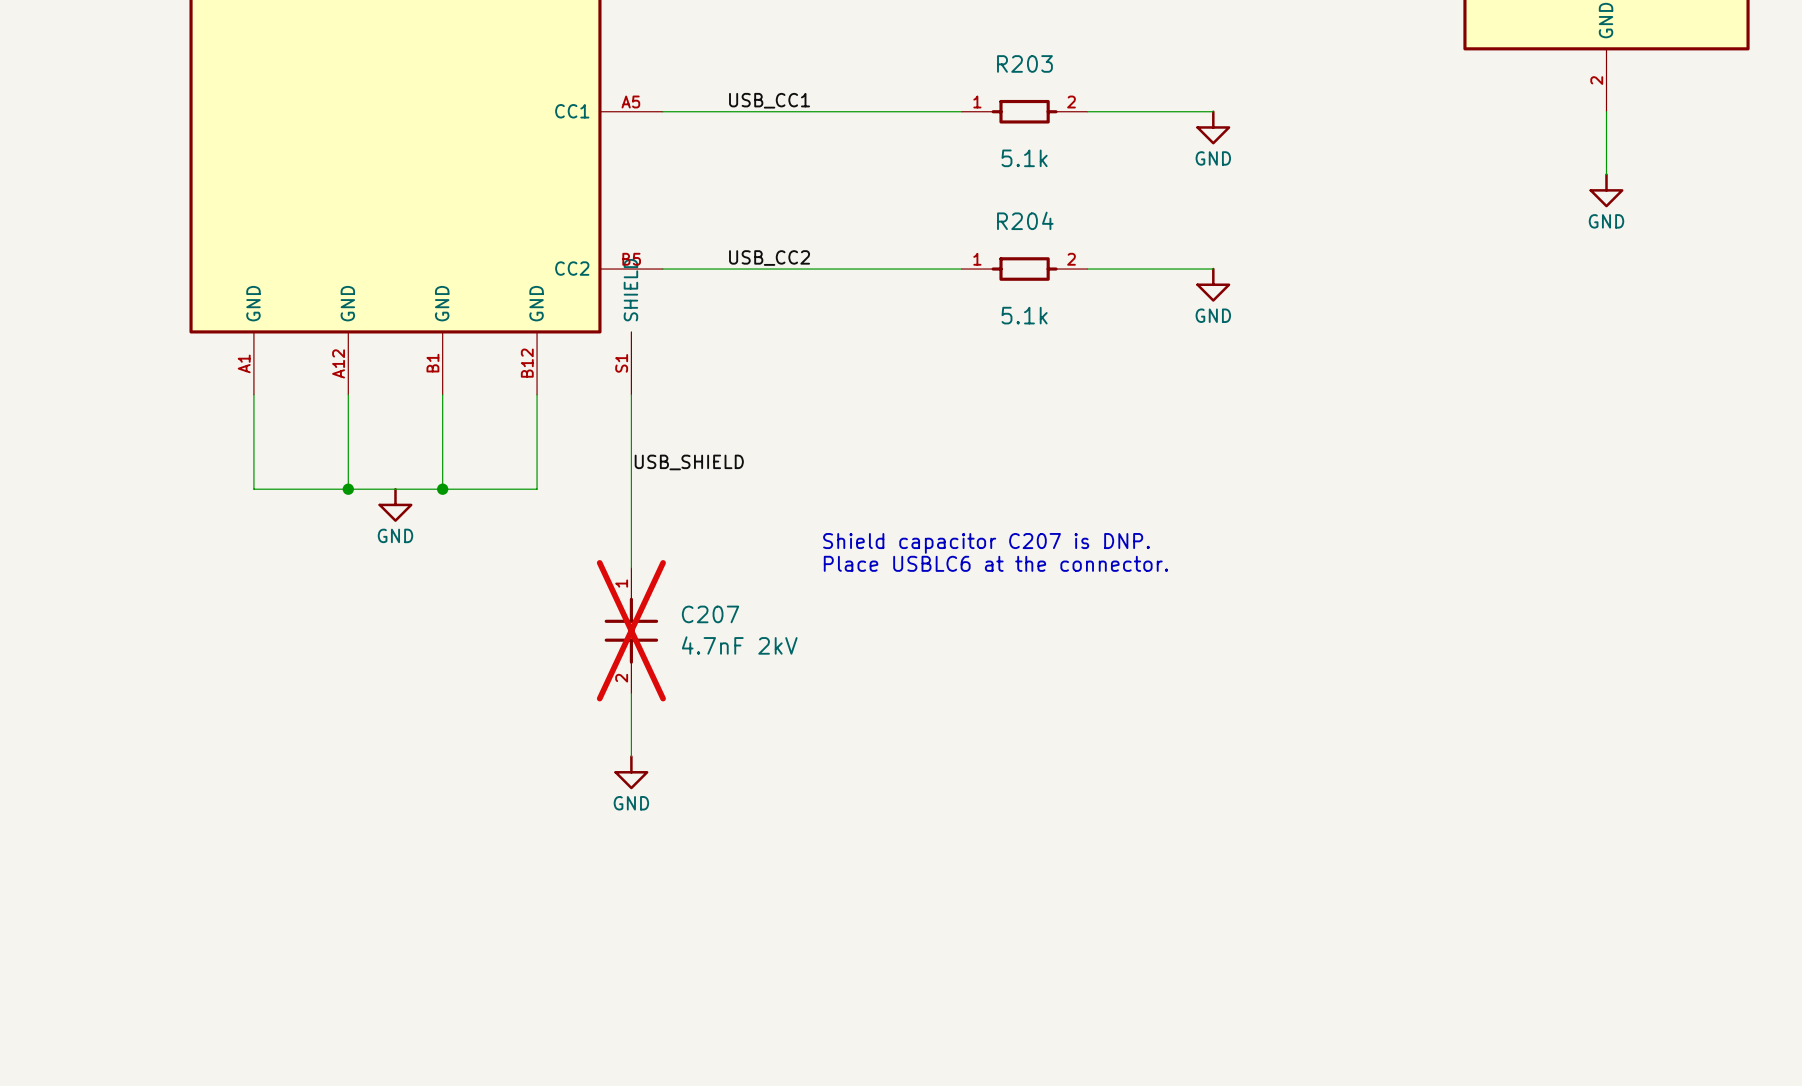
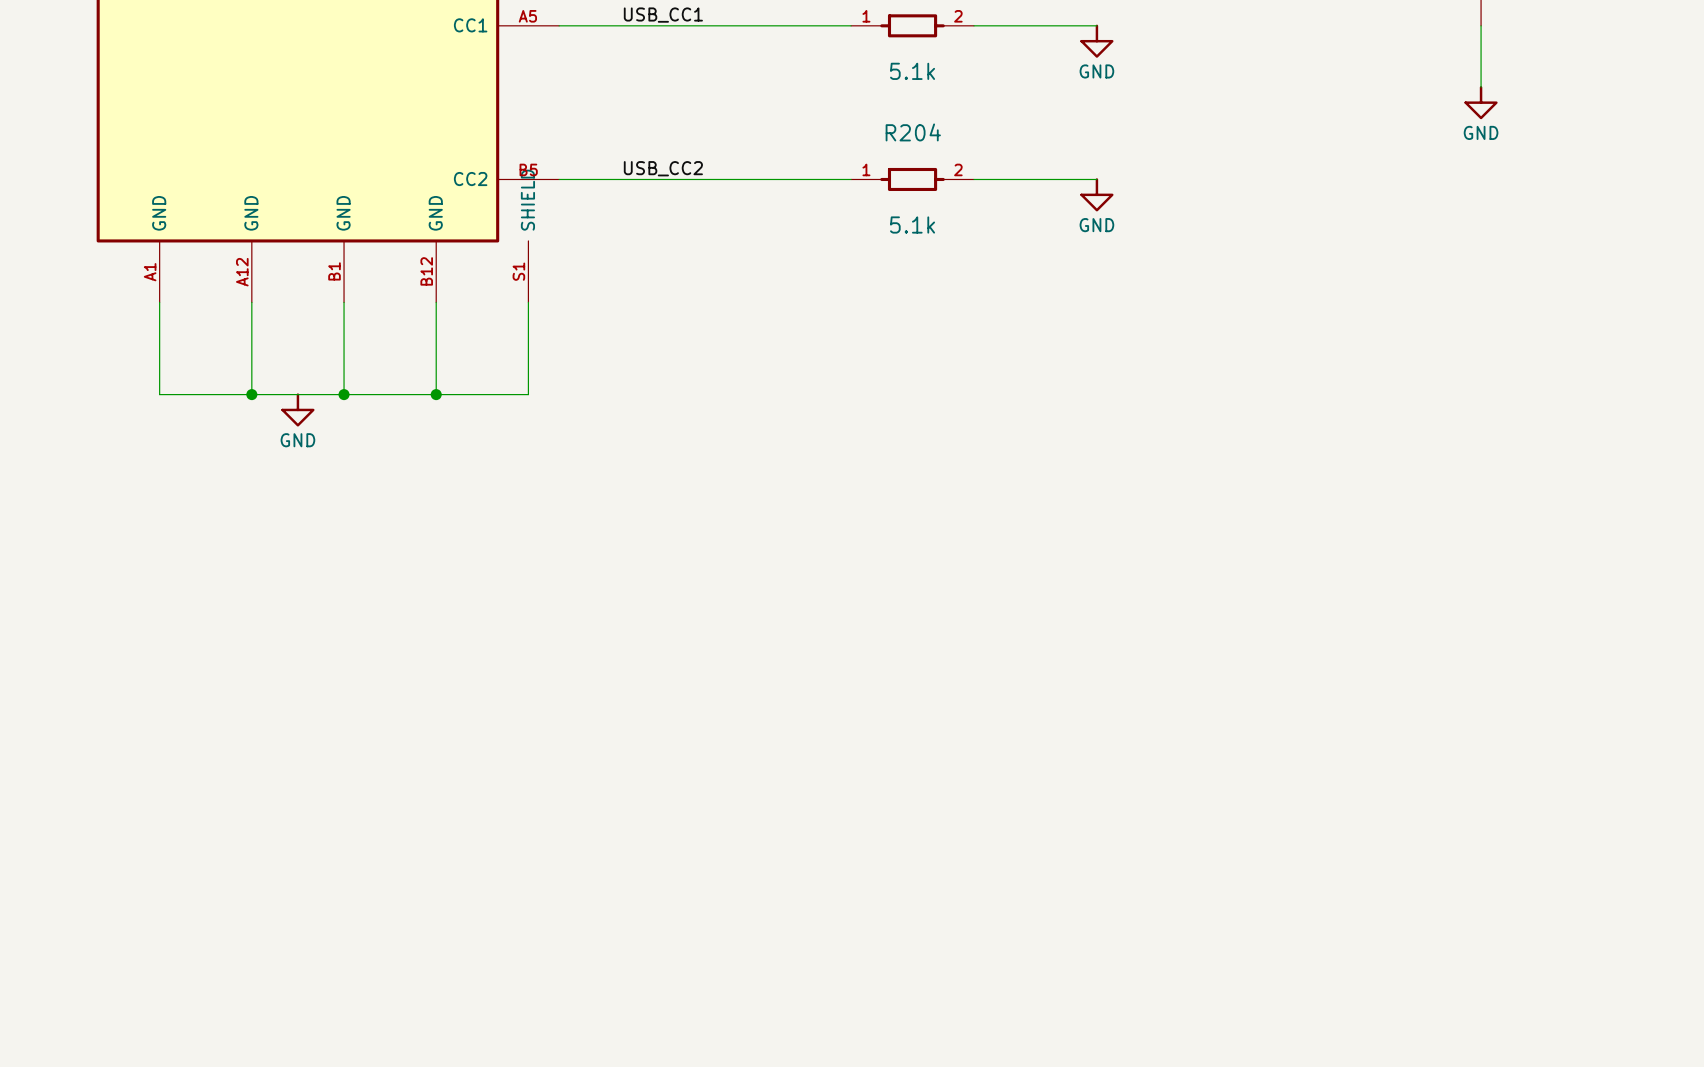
label: USB_SHIELD (689, 462) -> none
junction: none -> (436, 394)
wire: (631, 489) (631, 567) -> (528, 394) (436, 394)
text: Shield capacitor C207 is DNP. (986, 543) -> none
text: Place USBLC6 at the connector. (995, 563) -> none
C207: 4.7nF 2kV (631, 630) -> none
wire: (631, 693) (631, 756) -> none
power symbol: GND (631, 772) -> none

